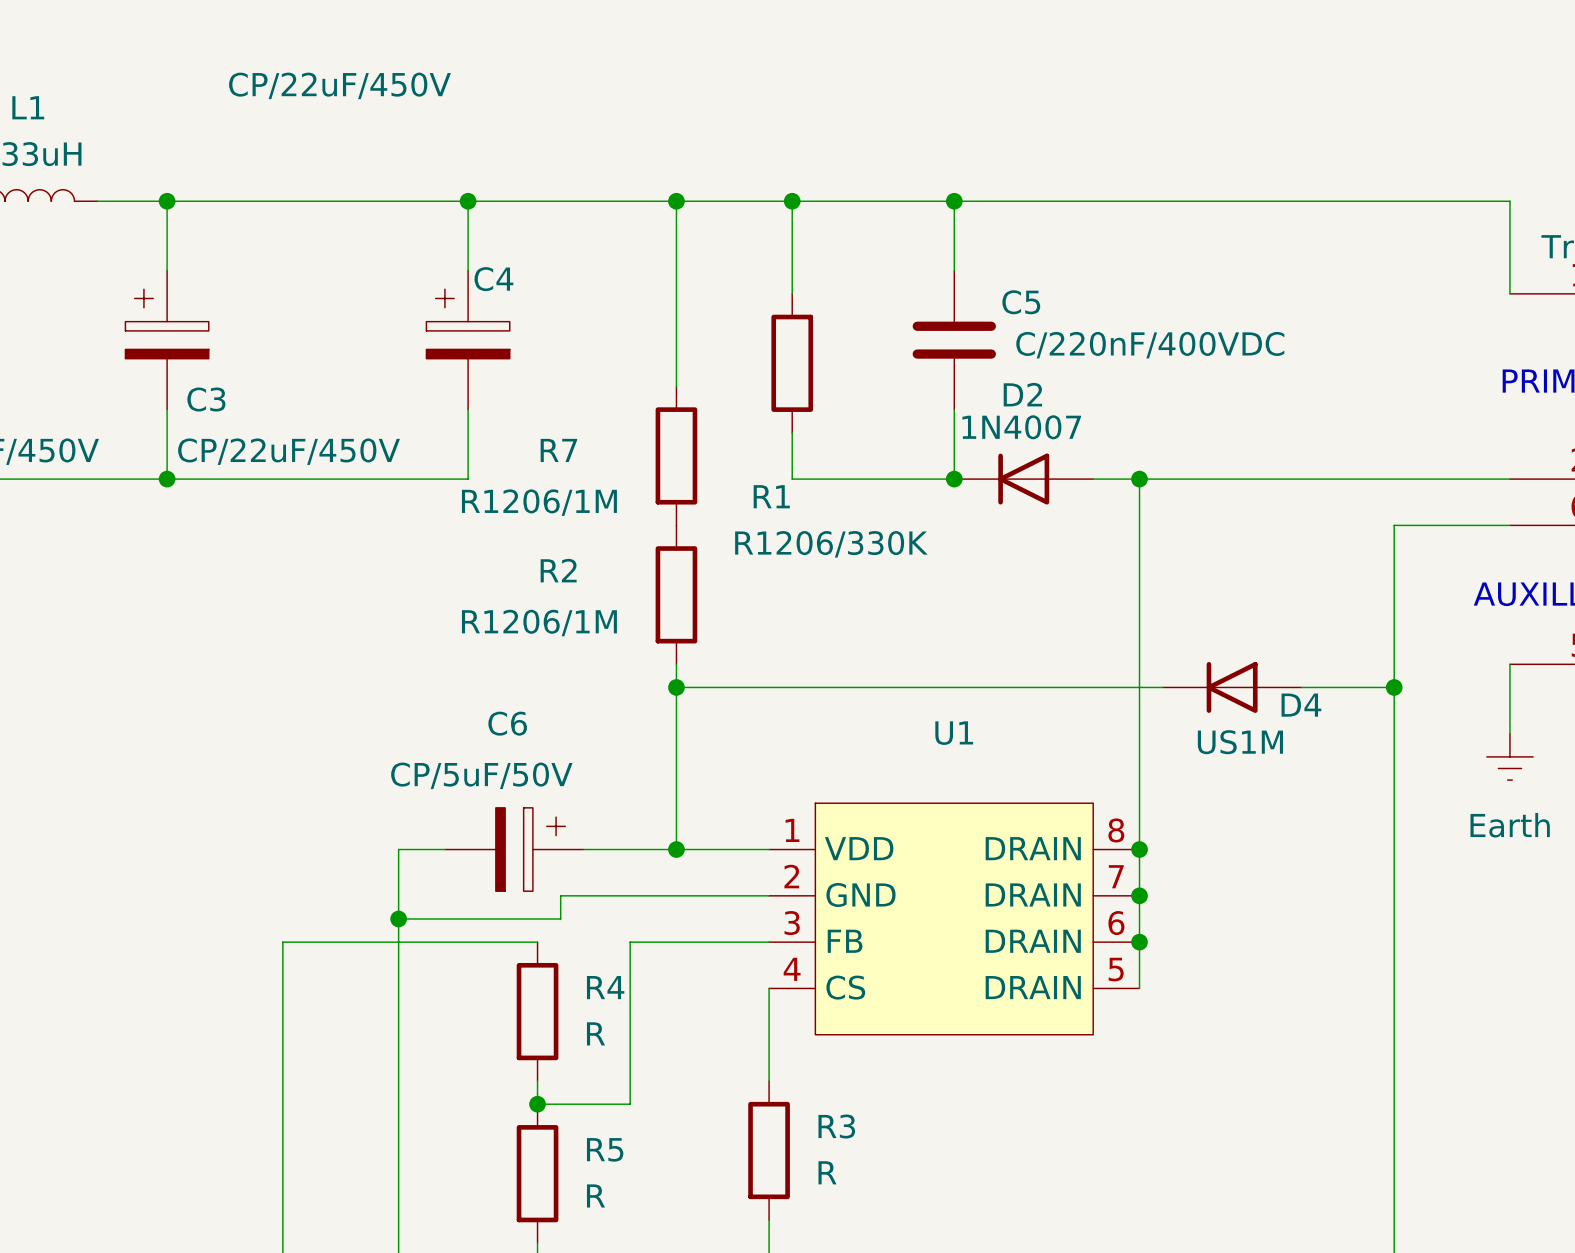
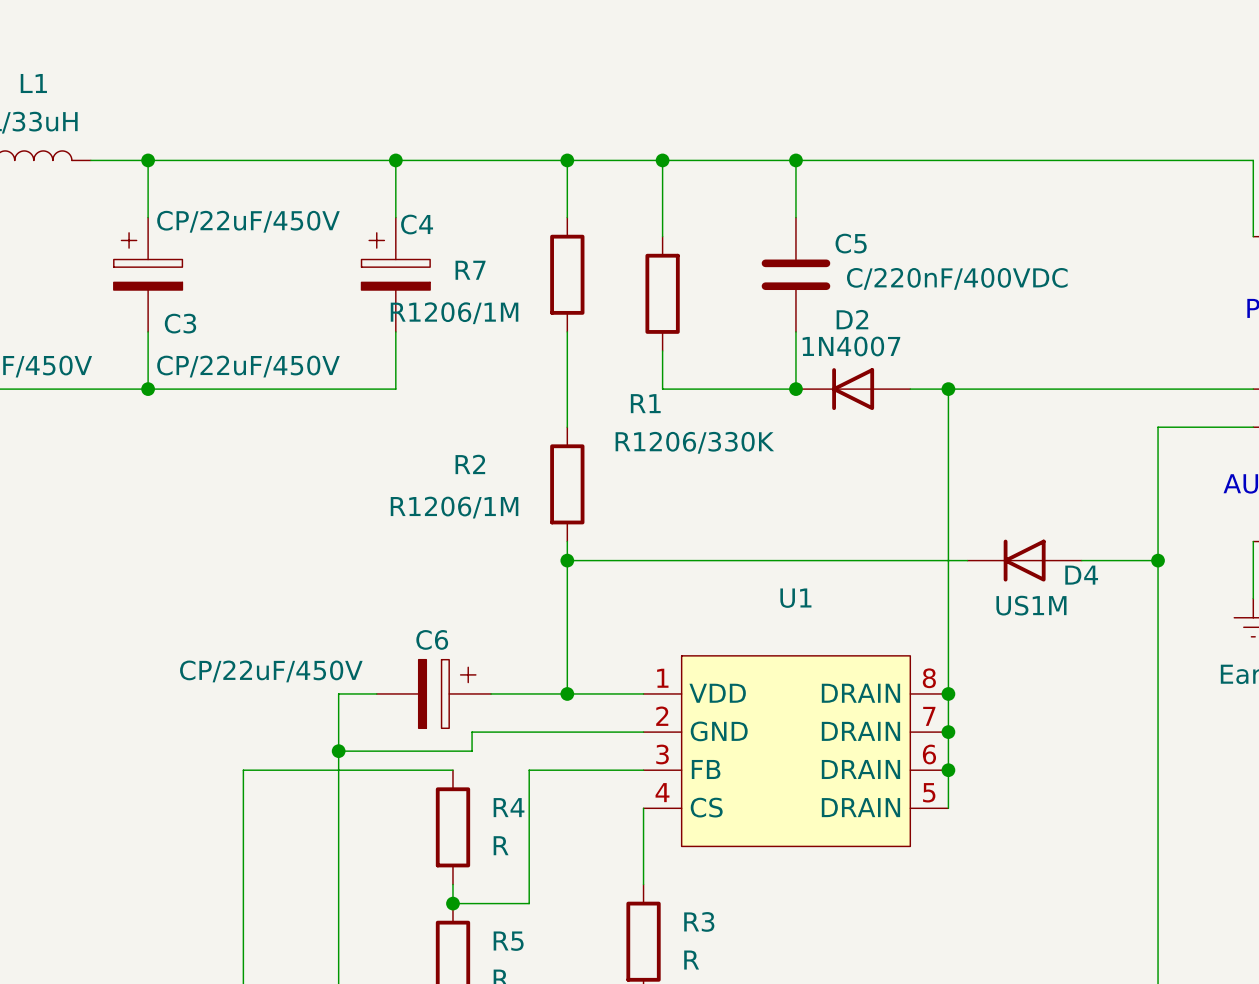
C4 value position: CP/22uF/450V (339, 85) -> CP/22uF/450V (248, 221)
wire: (676, 270) (676, 386) -> (567, 331) (567, 427)
R7 position: (676, 455) -> (567, 274)
C6 name position: C6 (507, 723) -> C6 (432, 639)
C6 value: CP/5uF/50V (481, 775) -> CP/22uF/450V (271, 671)

